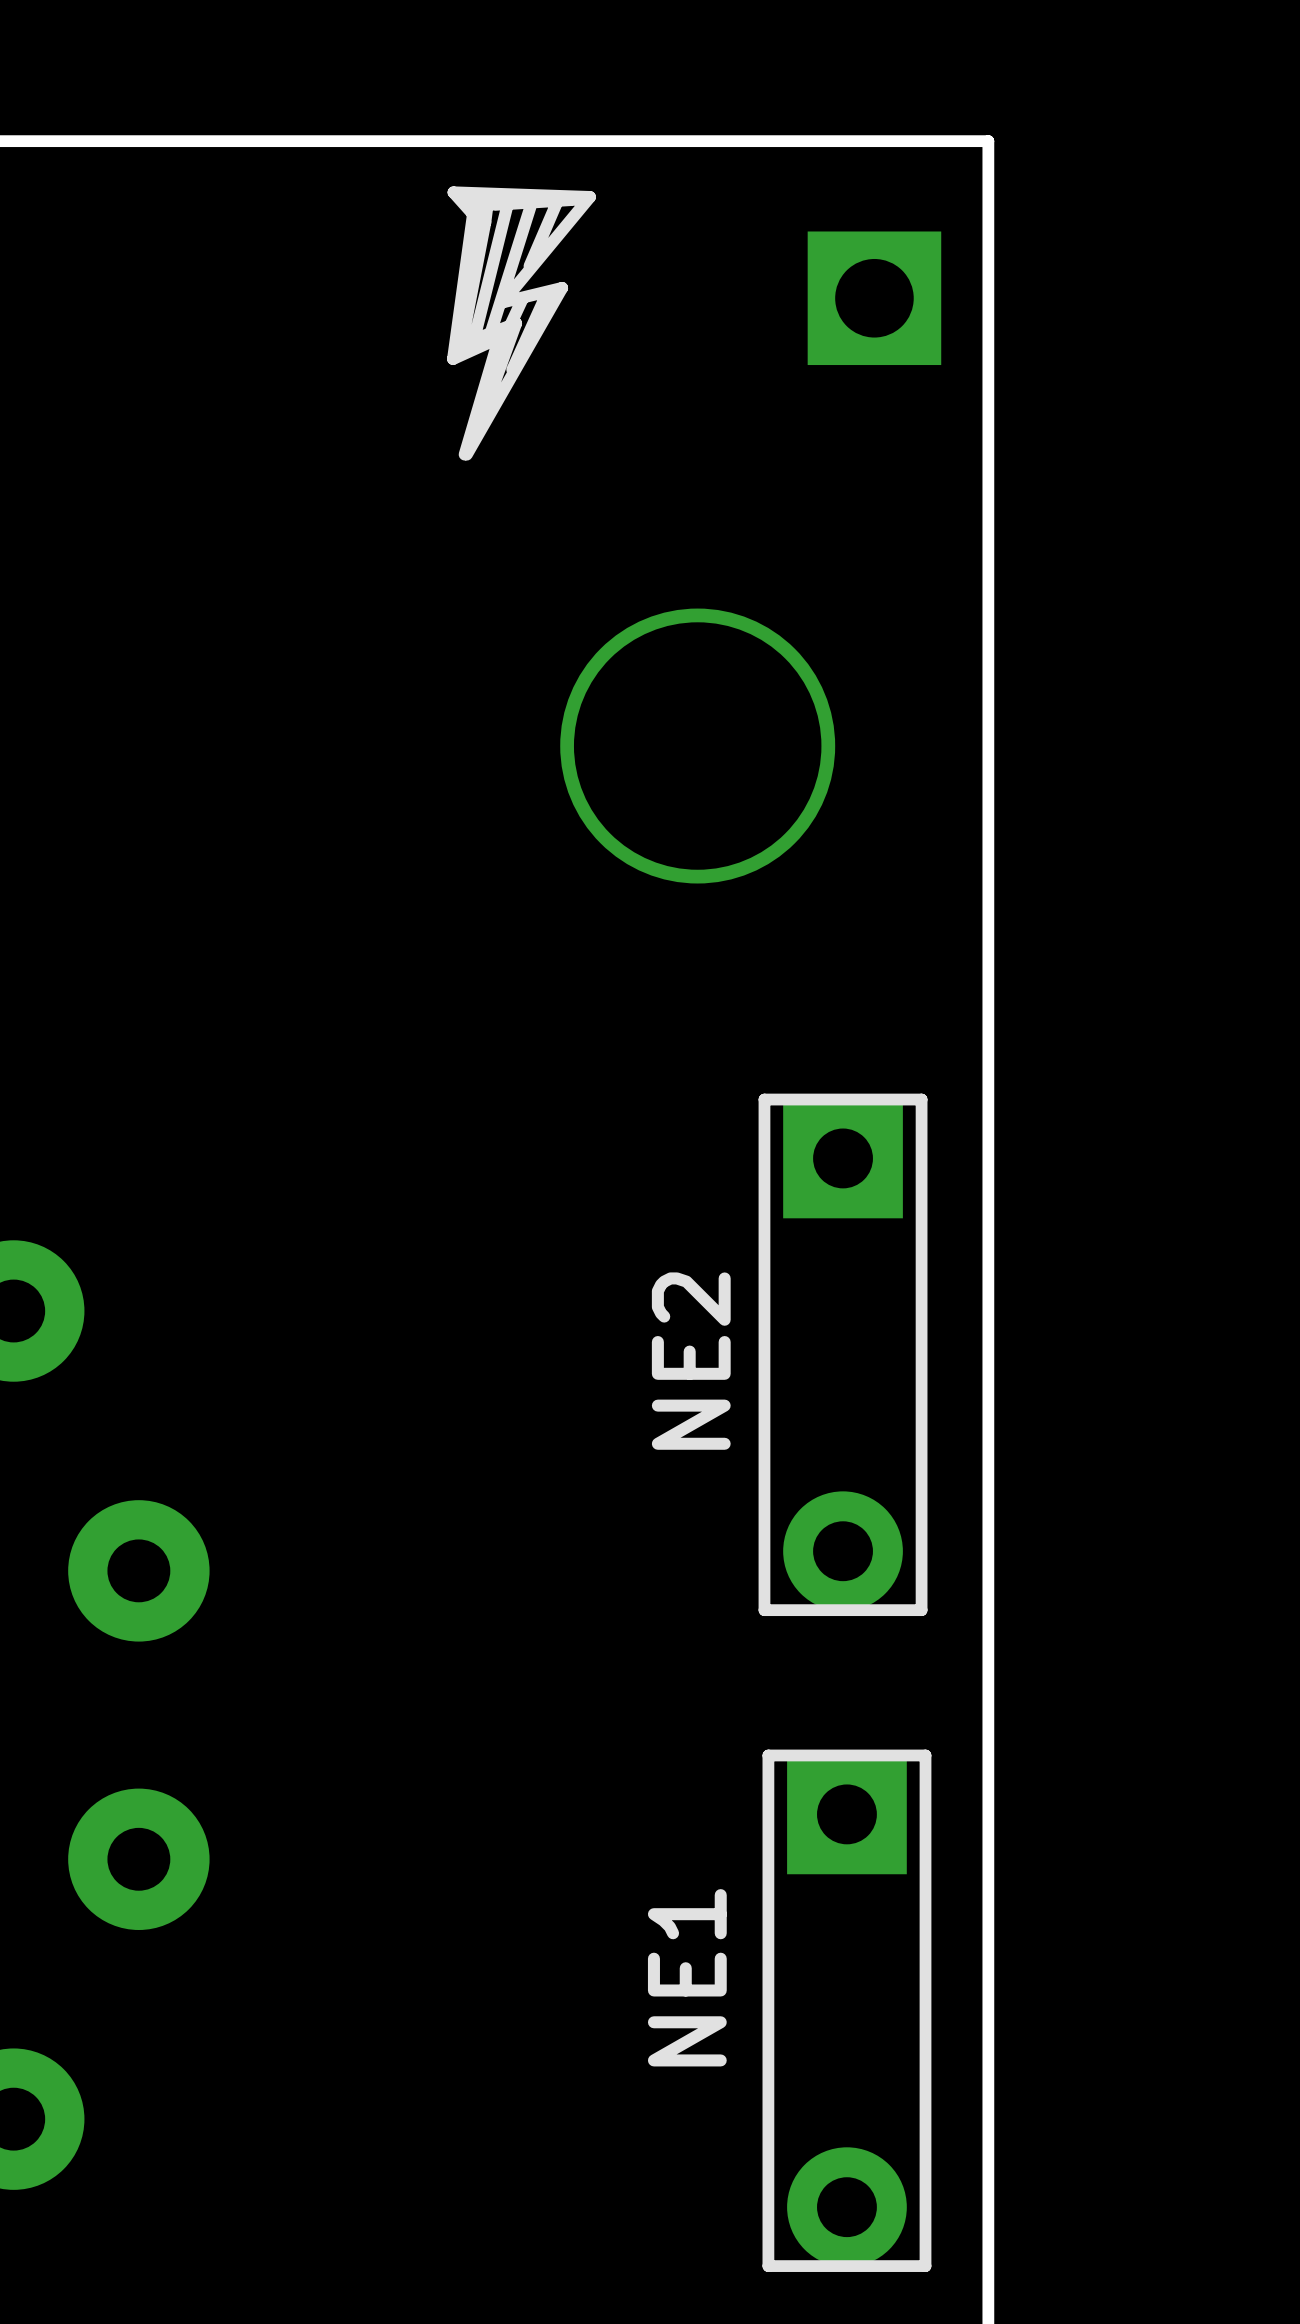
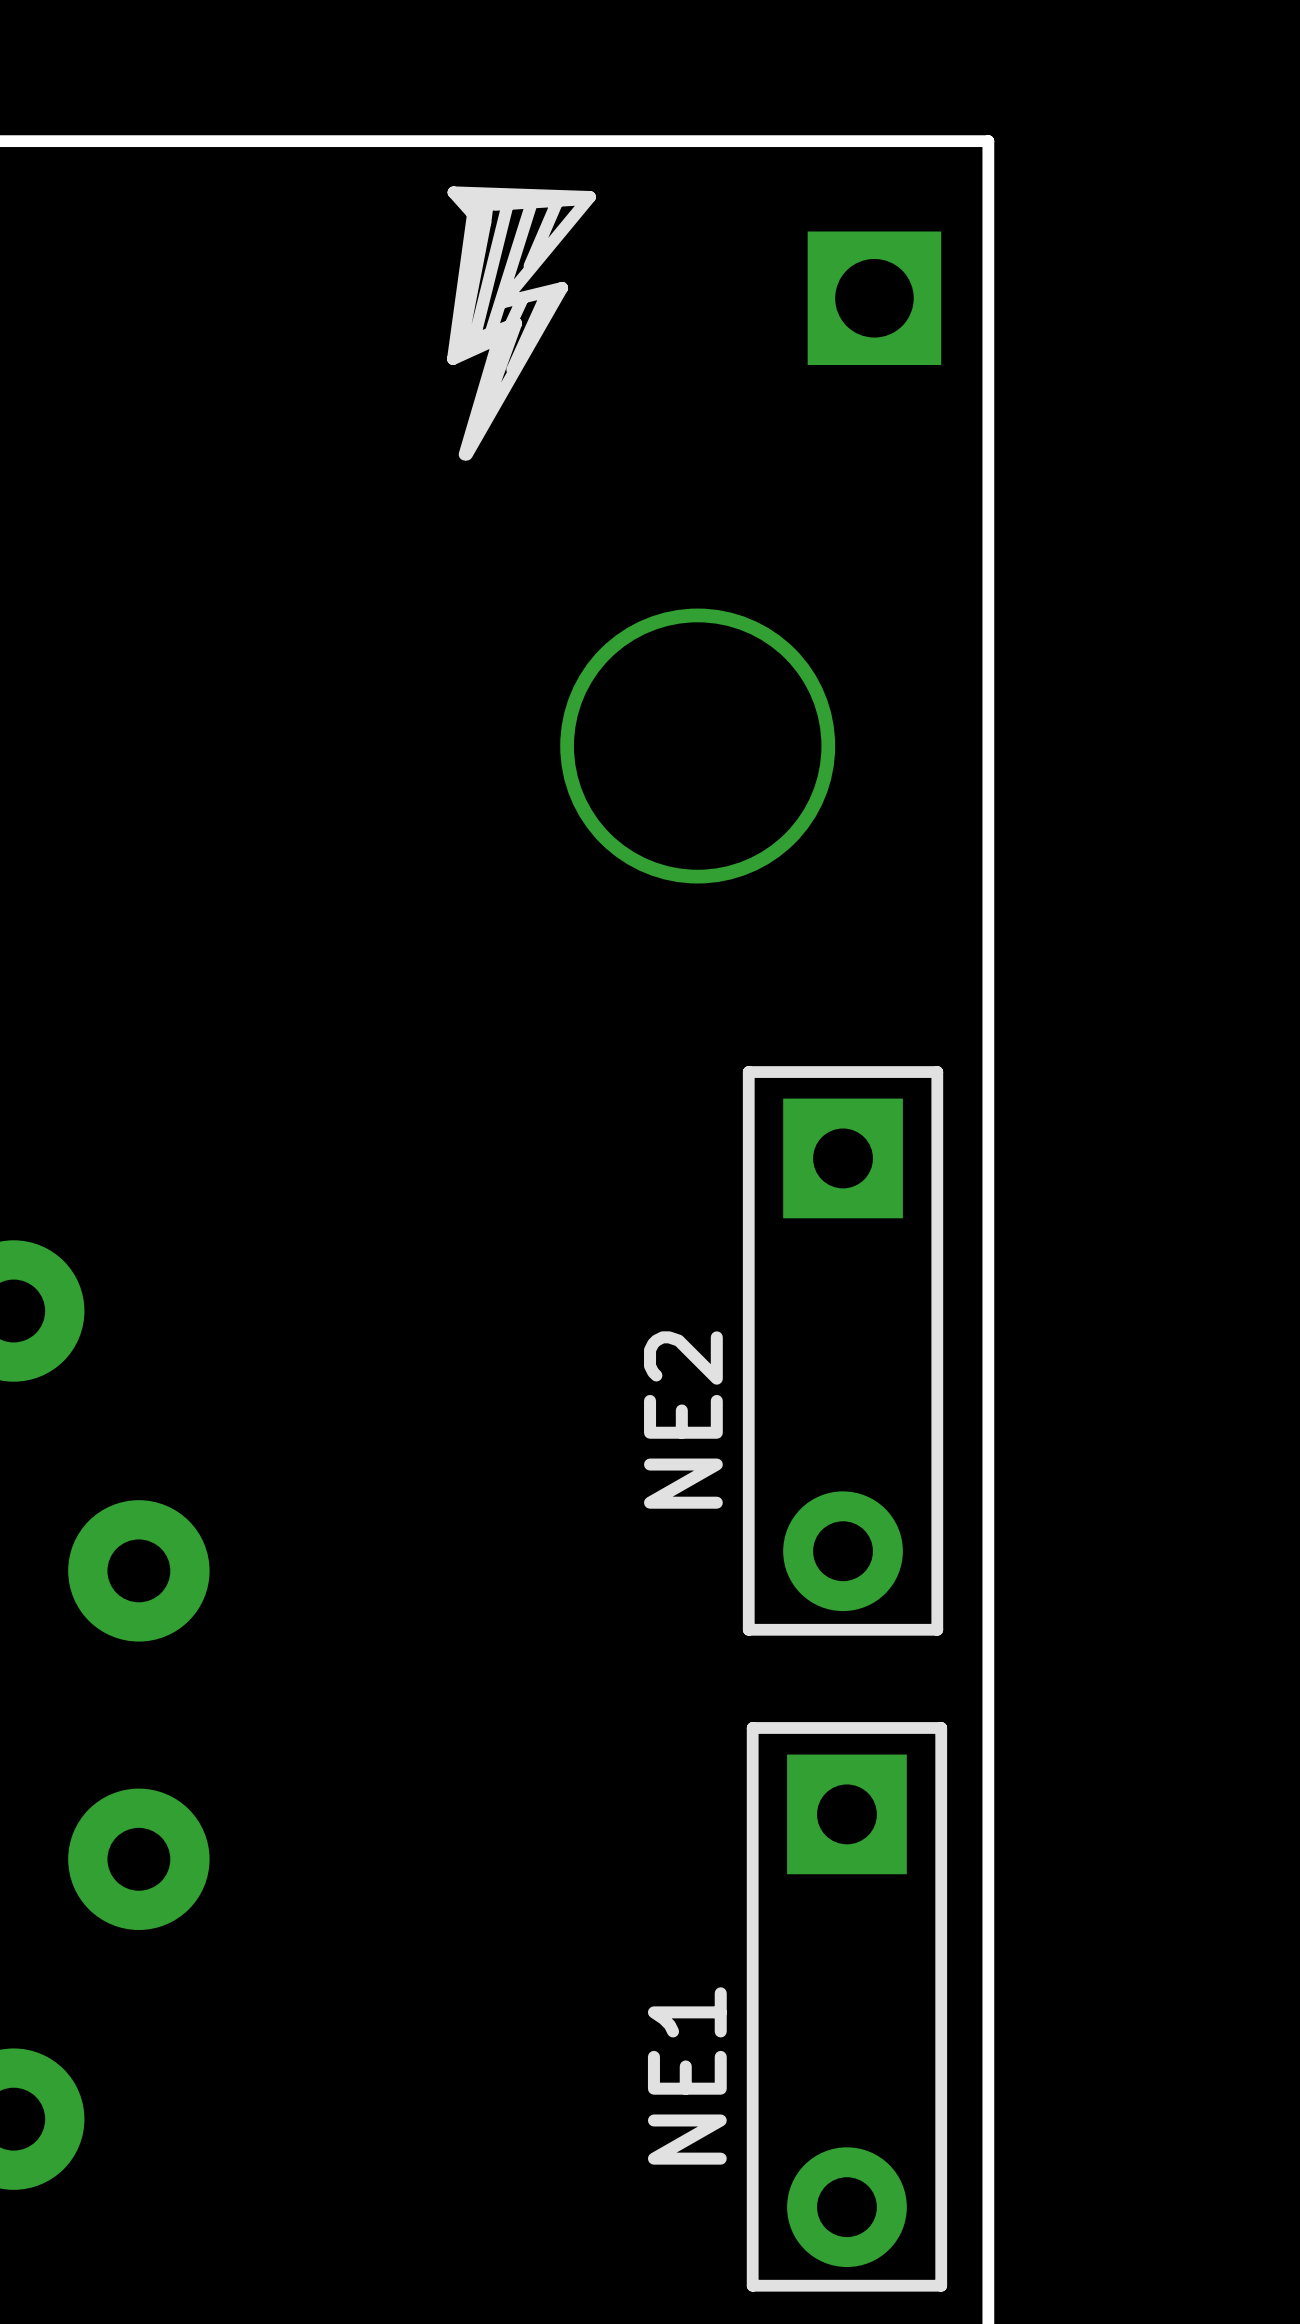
NE2 footprint: [758, 1093, 928, 1617] -> [742, 1066, 944, 1636]
NE2 name position: NE2 (691, 1361) -> NE2 (683, 1420)
NE1 footprint: [762, 1749, 932, 2272] -> [746, 1722, 948, 2292]
NE1 name position: NE1 (687, 1977) -> NE1 (687, 2075)

